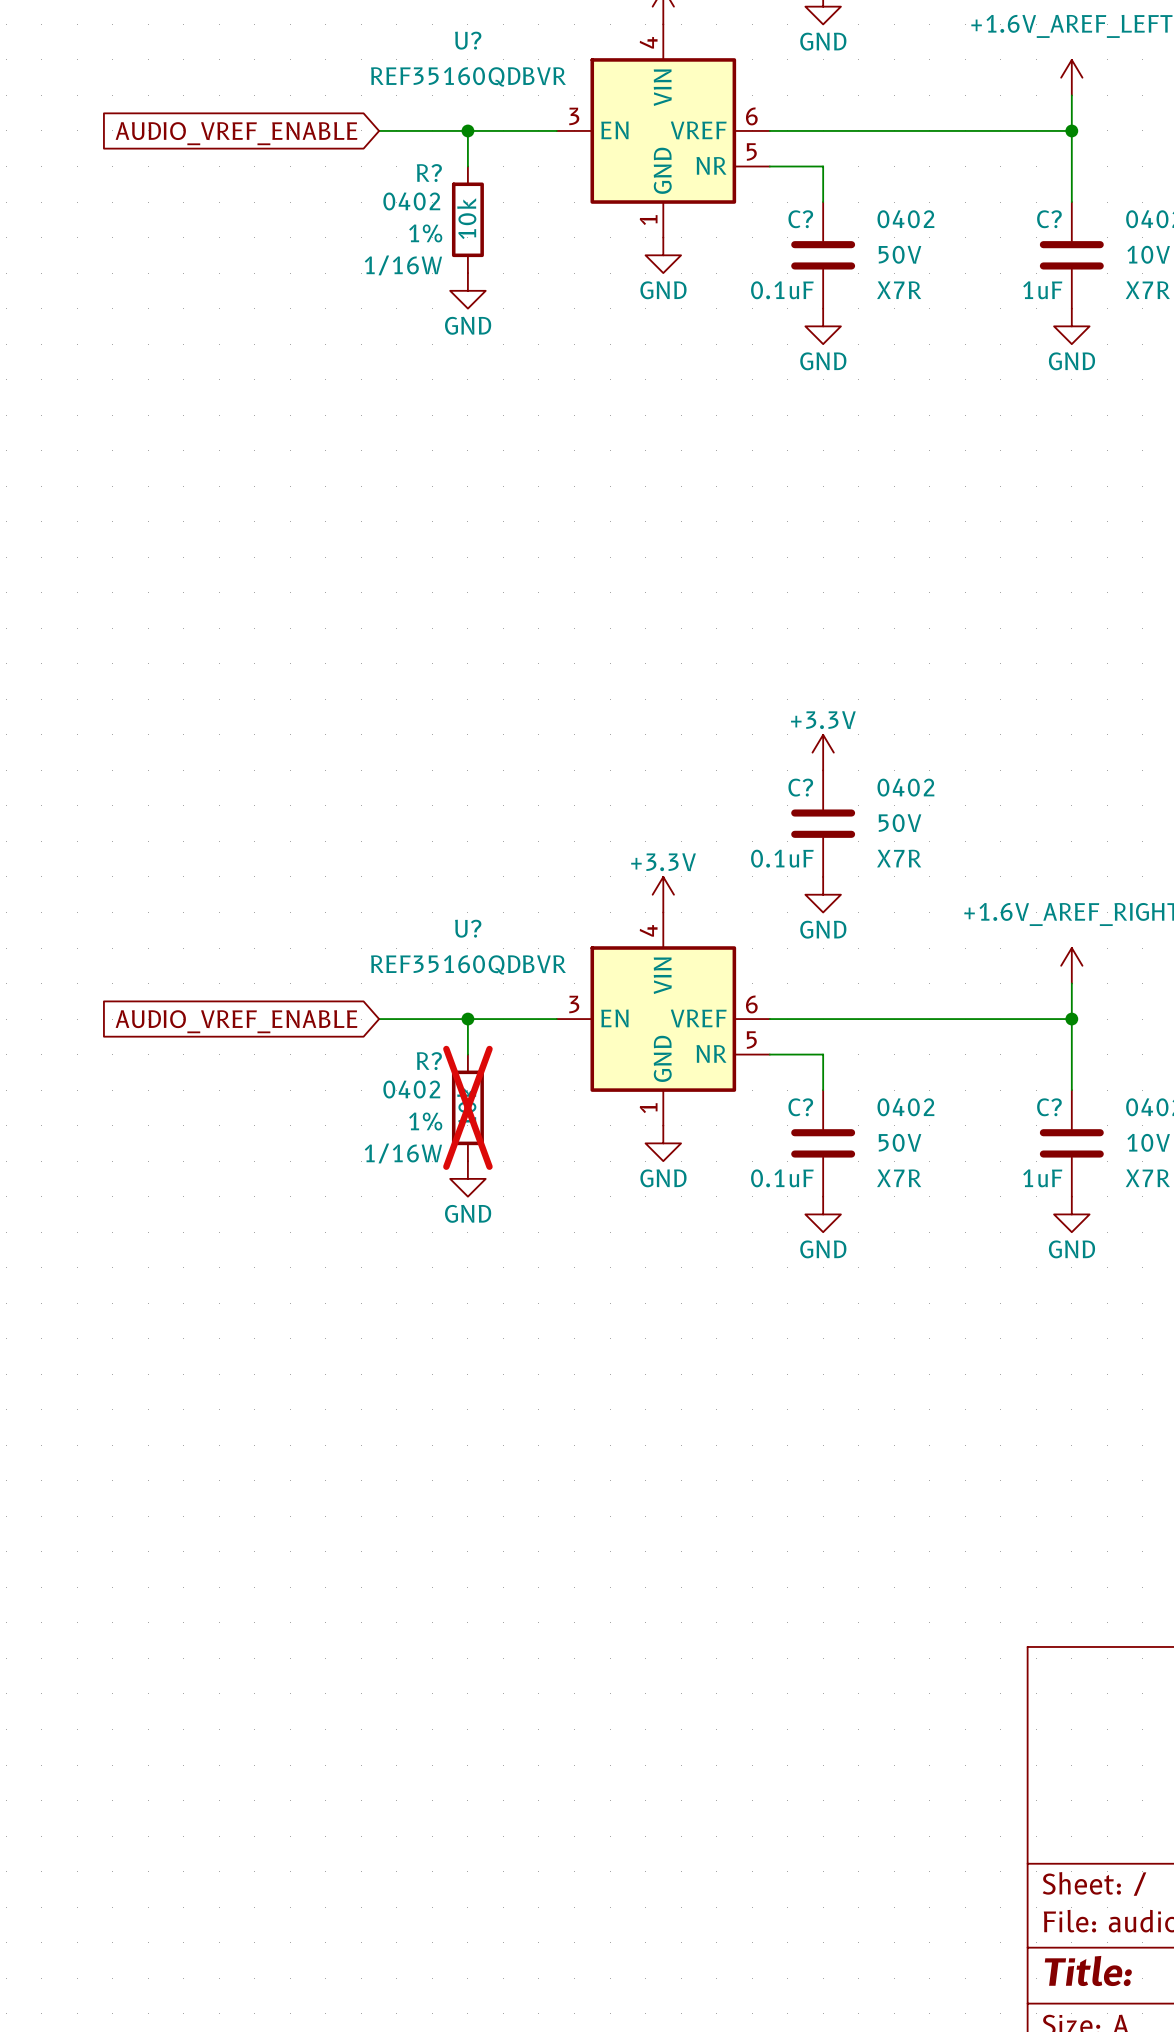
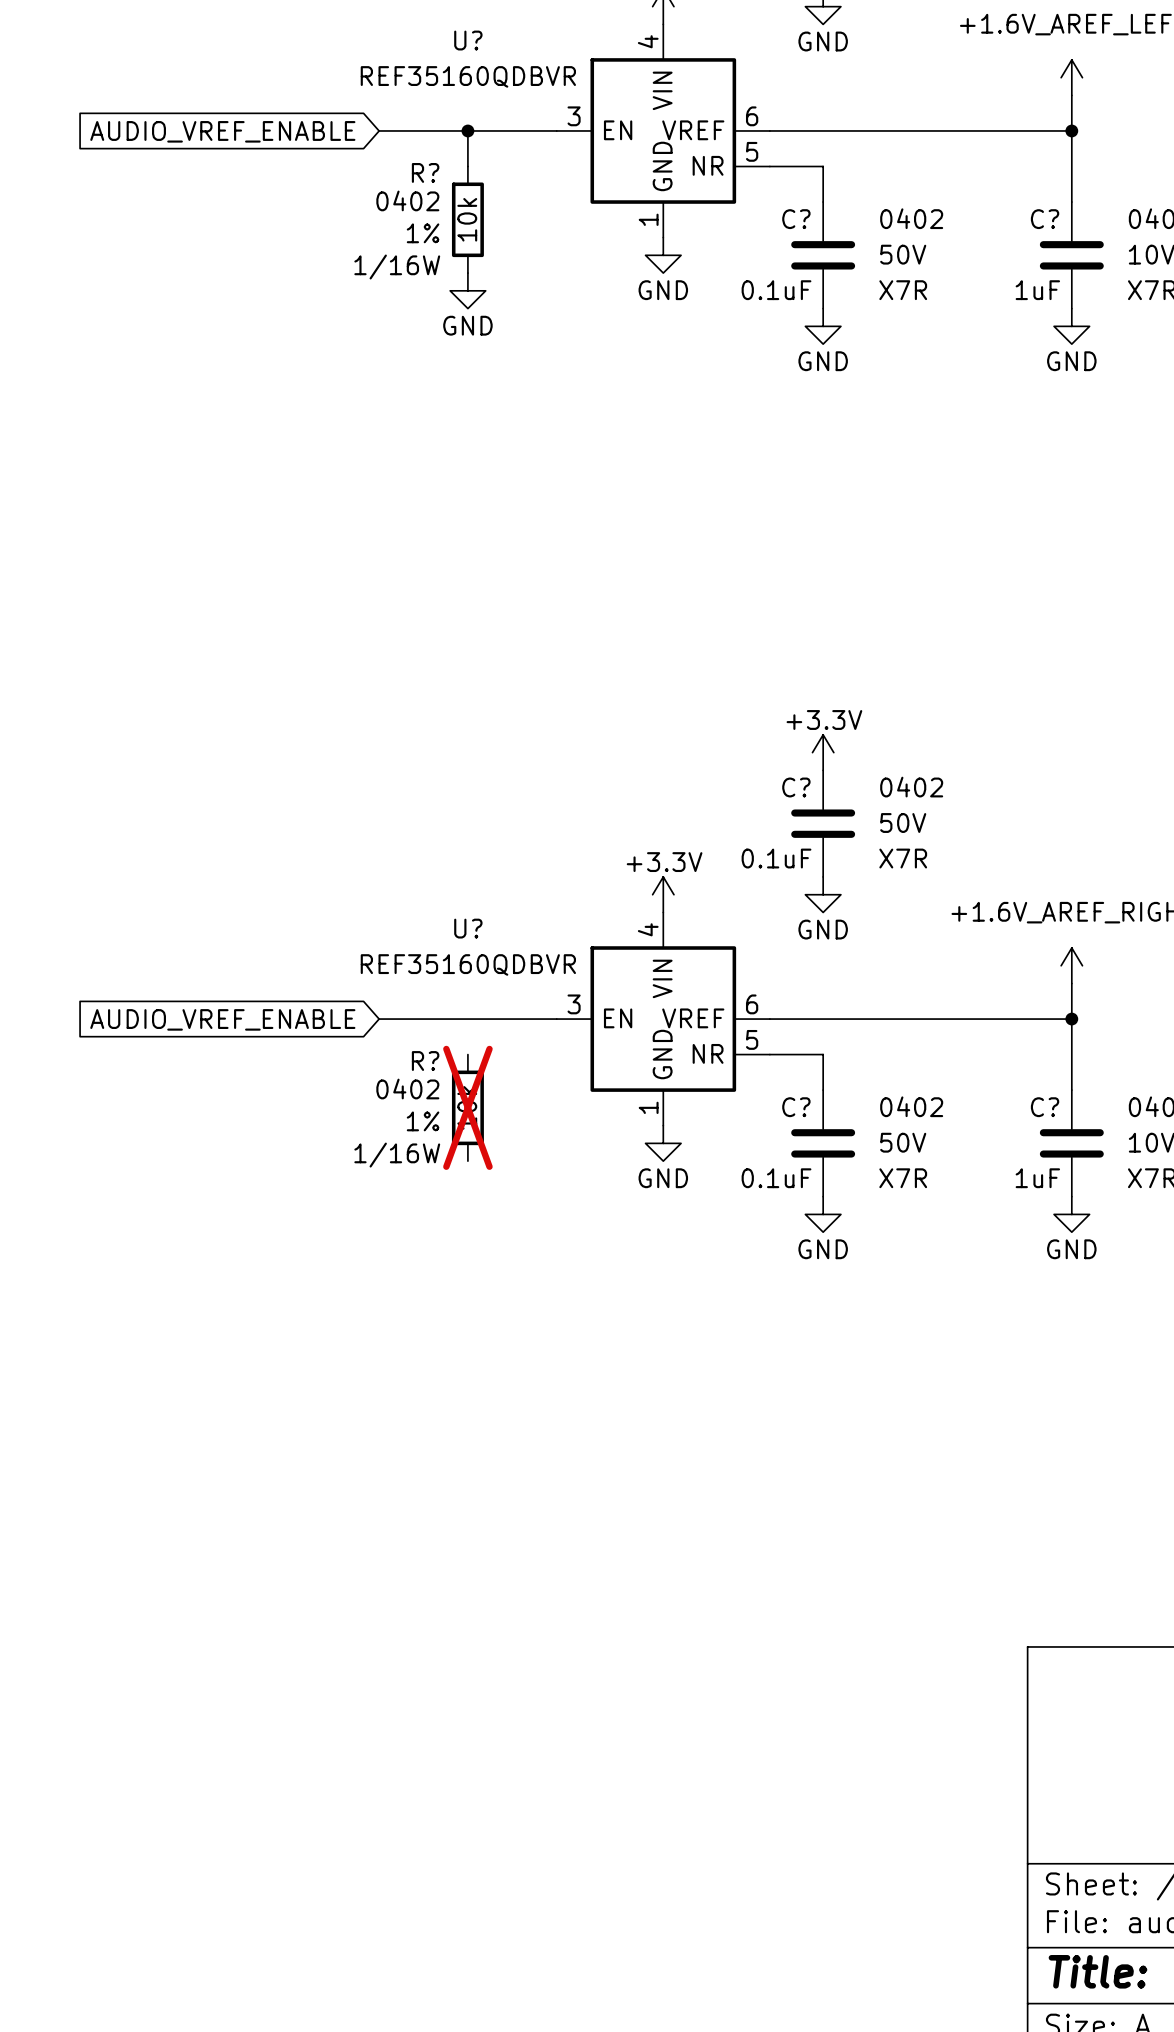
wire: (467, 1019) (467, 1054) -> none
junction: (467, 1019) -> none
power symbol: GND (467, 1178) -> none

